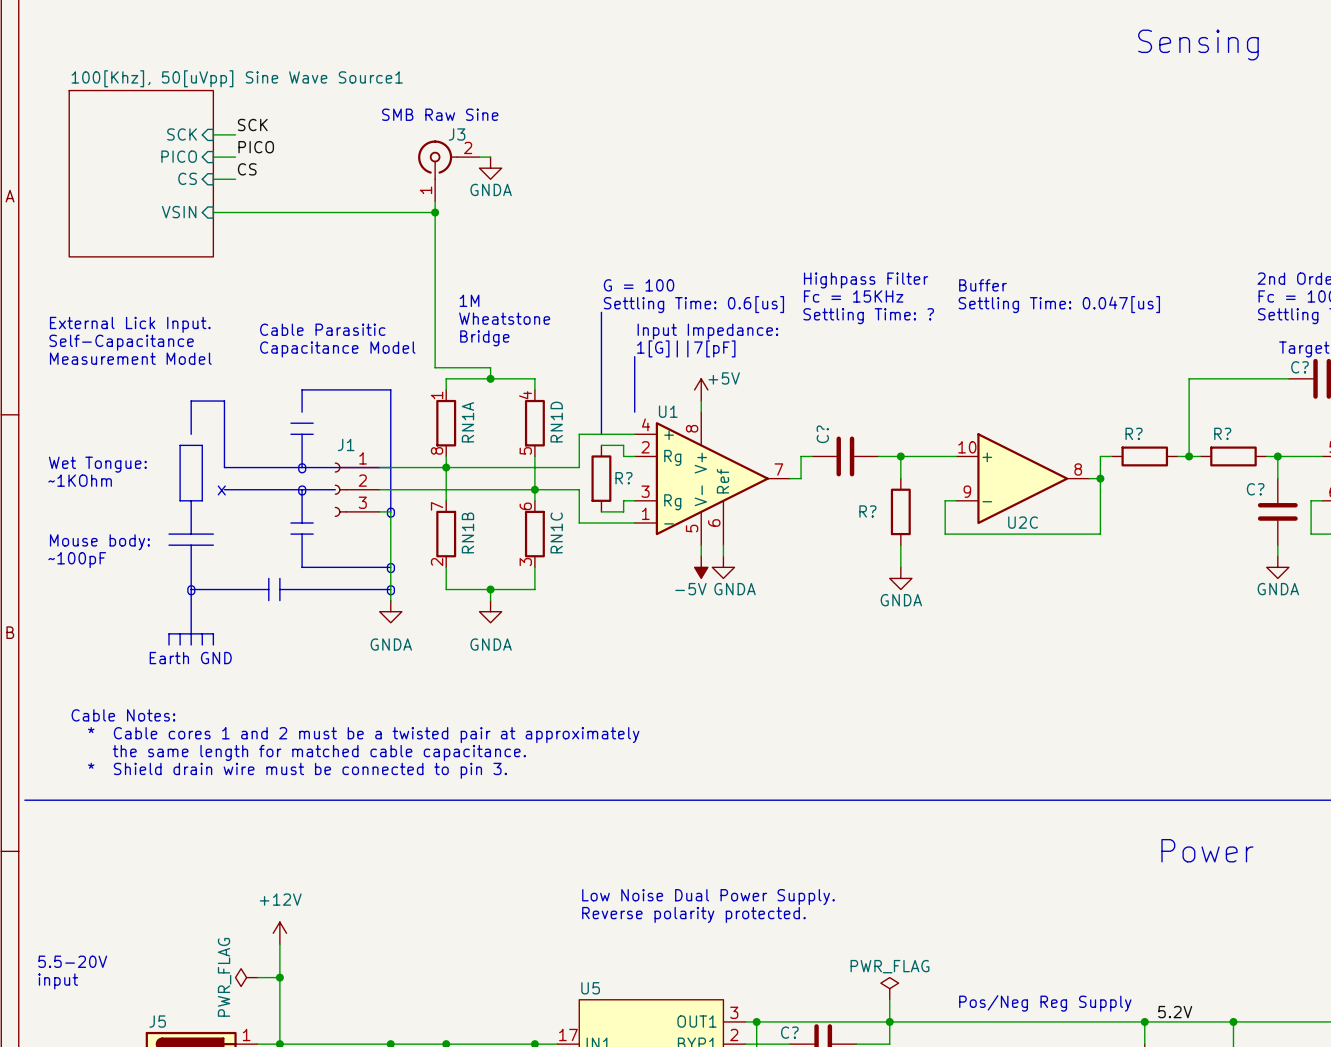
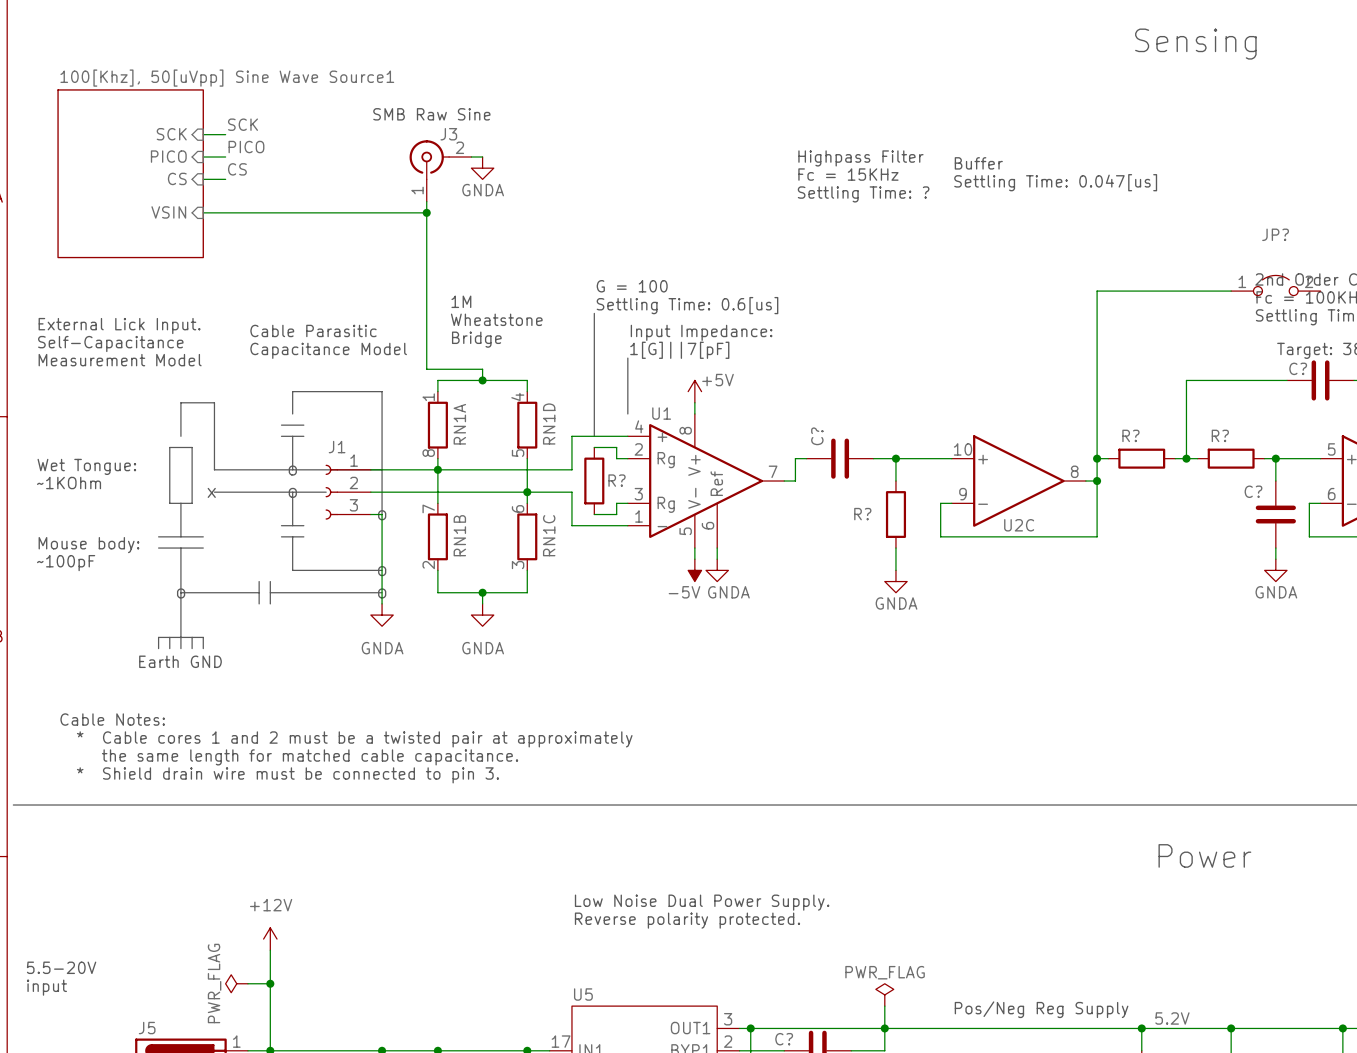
text position: Highpass Filter (866, 280) -> Highpass Filter (860, 158)
JP?: none -> (1275, 285)
text position: Buffer (983, 285) -> Buffer (978, 163)
wire: none -> (1231, 291) (1097, 291) (1097, 458)
text position: Fc = 15KHz (853, 296) -> Fc = 15KHz (848, 174)
text position: Settling Time: 0.047[us] (1059, 304) -> Settling Time: 0.047[us] (1055, 182)
text position: Settling Time: ? (868, 316) -> Settling Time: ? (863, 194)
junction: none -> (1097, 458)

